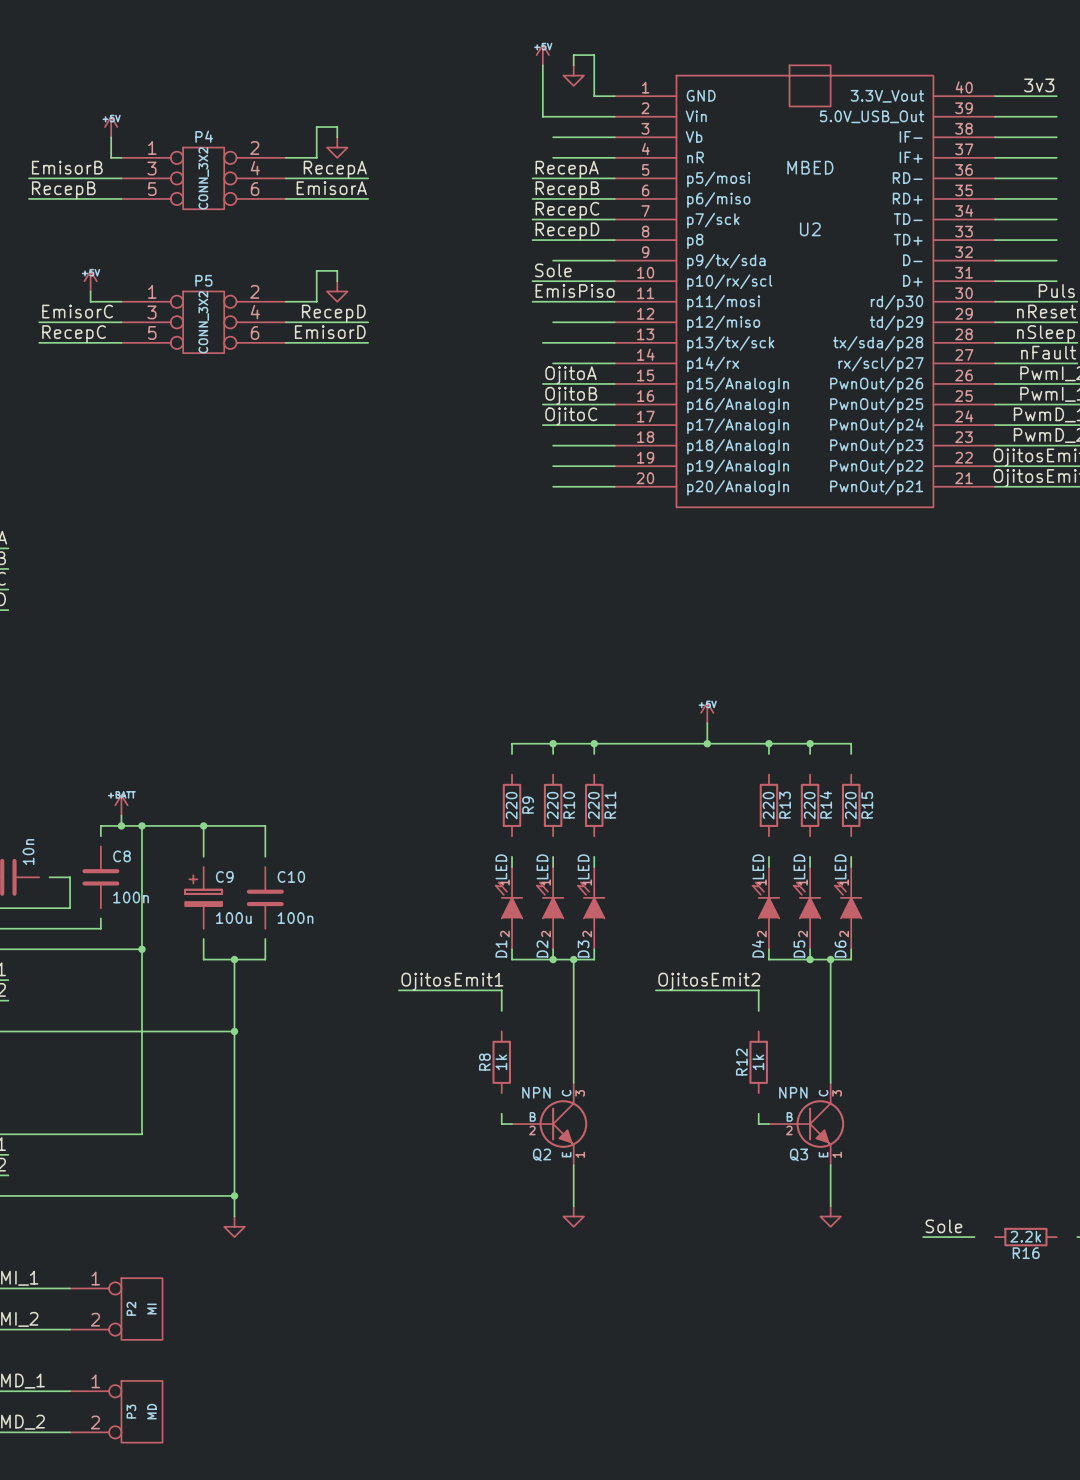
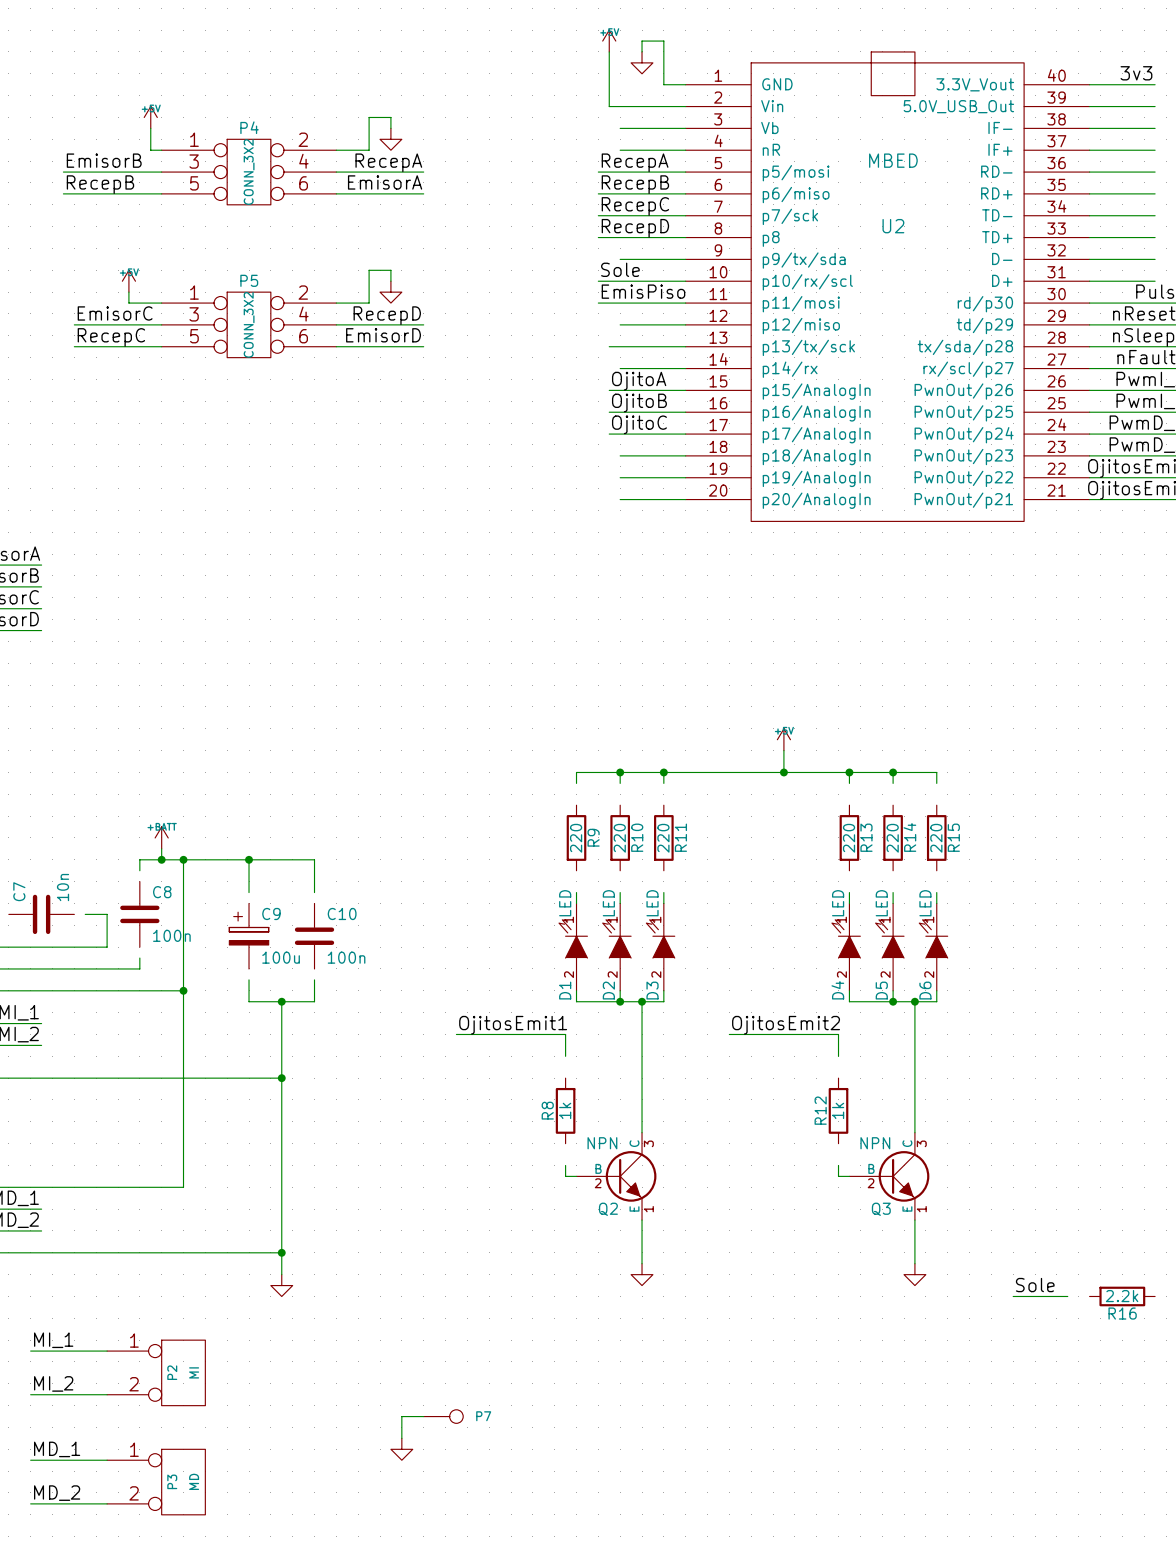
wire: none -> (423, 1416) (401, 1416) (401, 1438)
P7: none -> (443, 1416)
power symbol: none -> (401, 1449)

